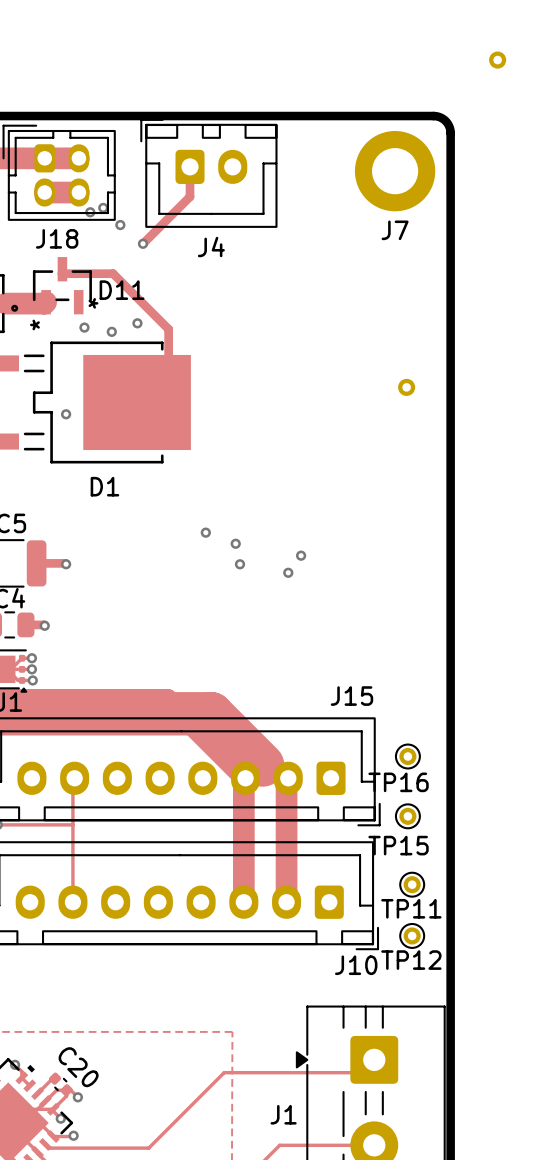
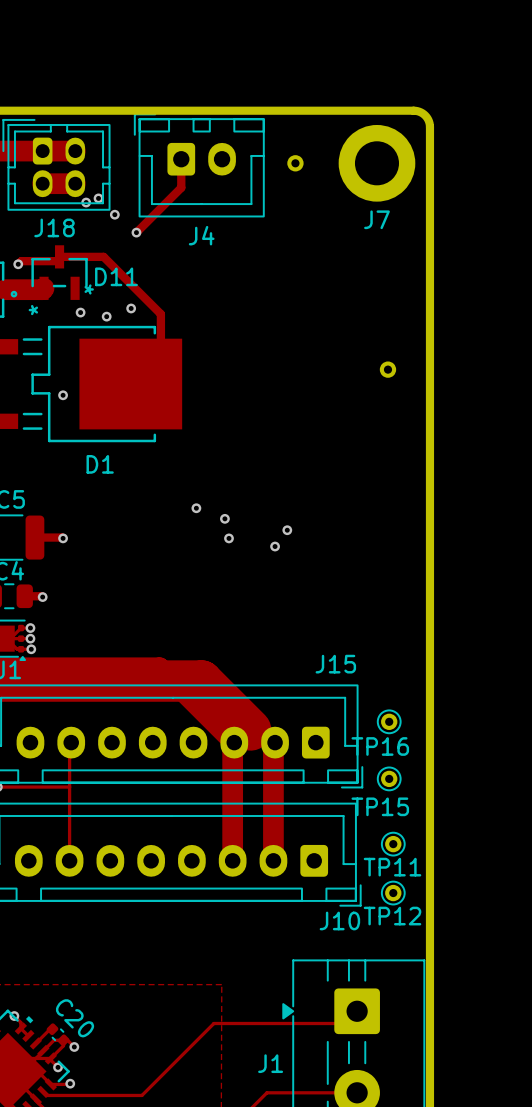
part position: (497, 60) -> (295, 163)
track: (61, 273) (113, 273) -> (18, 264) (21, 261) (58, 261) (59, 256) (103, 256) (107, 261)
via: none -> (18, 264)

